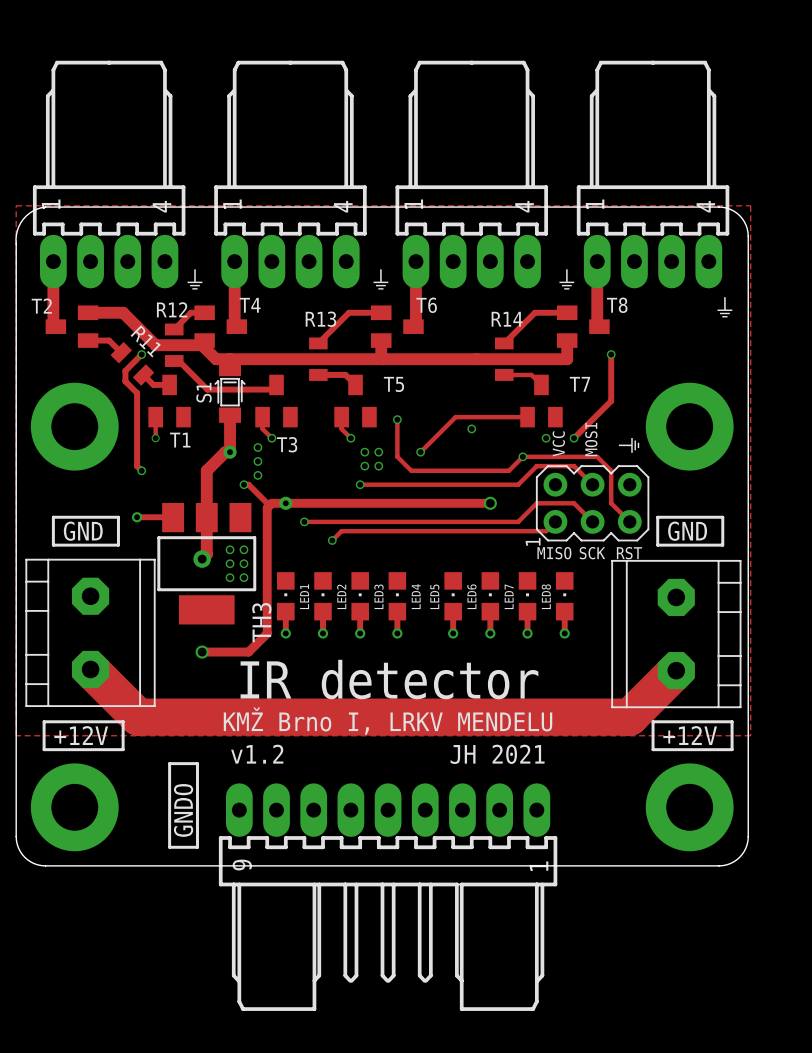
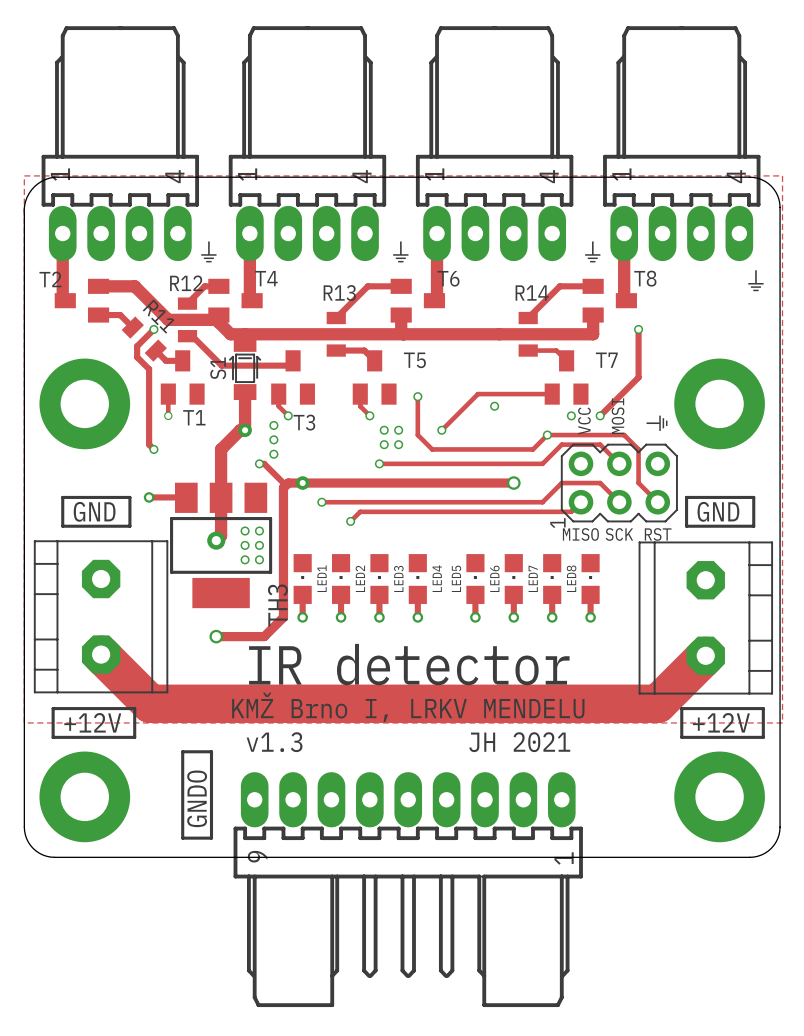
text: v1.2 (257, 754) -> v1.3 (274, 742)

